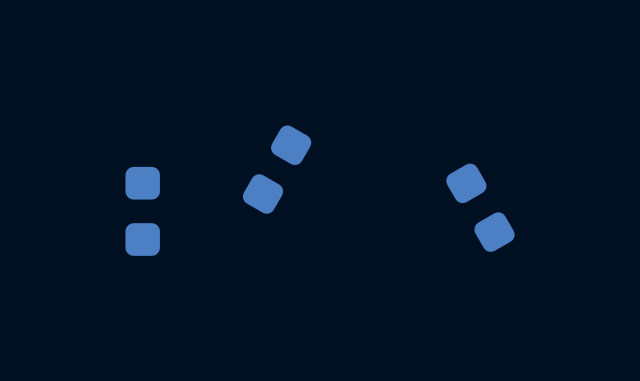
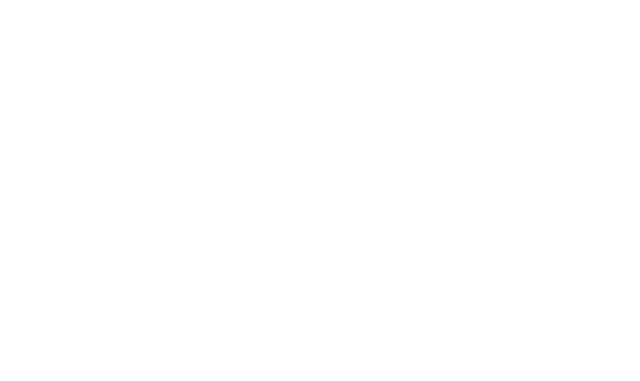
part: (277, 169) -> none
part: (480, 207) -> none
part: (142, 211) -> none

